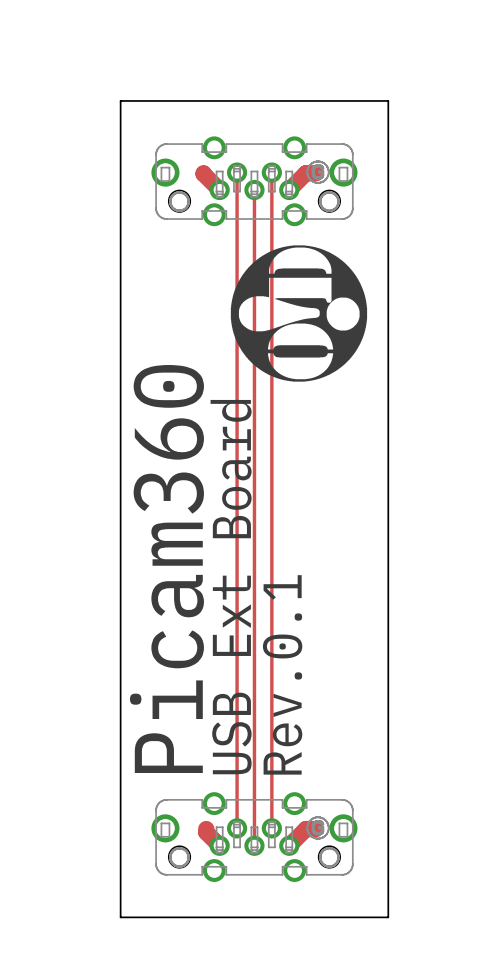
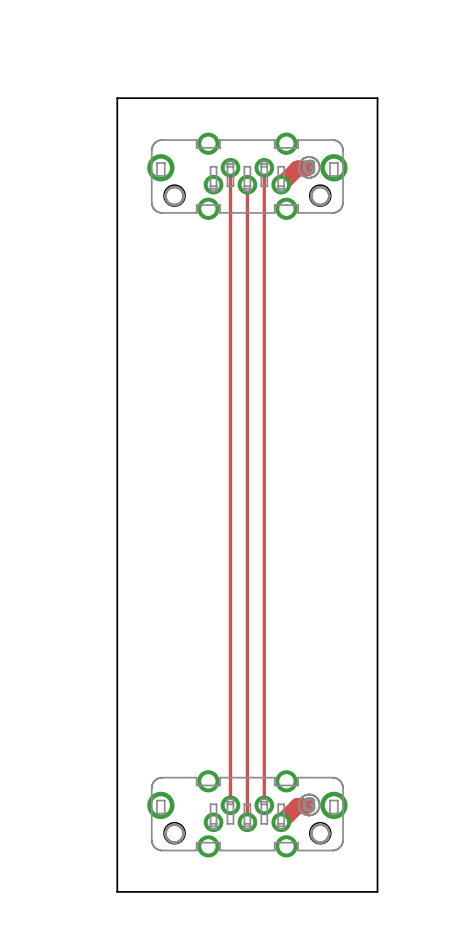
track: (203, 173) (219, 189) -> none
drawing: [230, 245, 368, 382] -> none
text: Picam360 (166, 568) -> none
text: USB Ext Board (231, 587) -> none
text: Rev.0.1 (282, 674) -> none
track: (206, 829) (206, 832) (219, 845) -> none

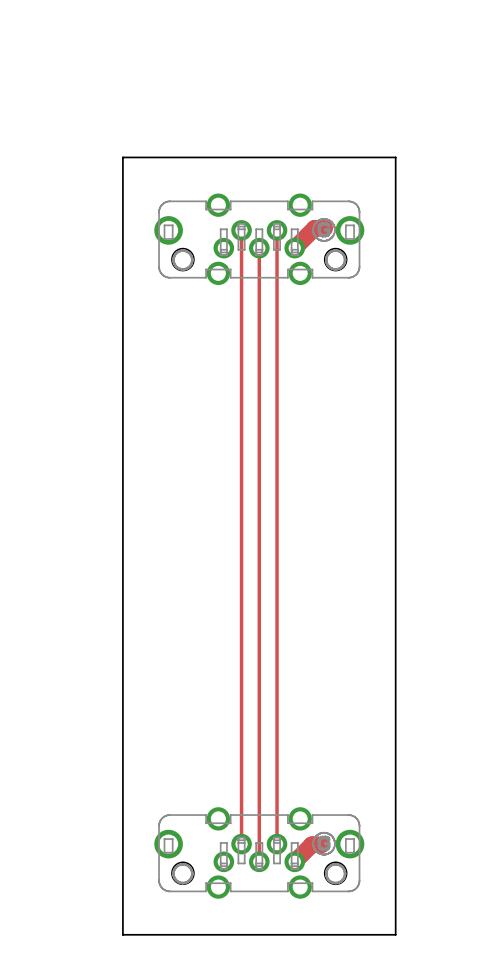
board edge: (117, 150) (117, 98) (377, 98) (377, 150) -> (122, 157) (395, 157)
track: (230, 167) (230, 219) -> none
track: (264, 167) (264, 219) -> none
track: (307, 168) (297, 168) (281, 184) -> none
part position: (247, 176) -> (259, 239)
track: (247, 184) (247, 236) -> none
track: none -> (324, 228) (314, 228) (294, 248)

